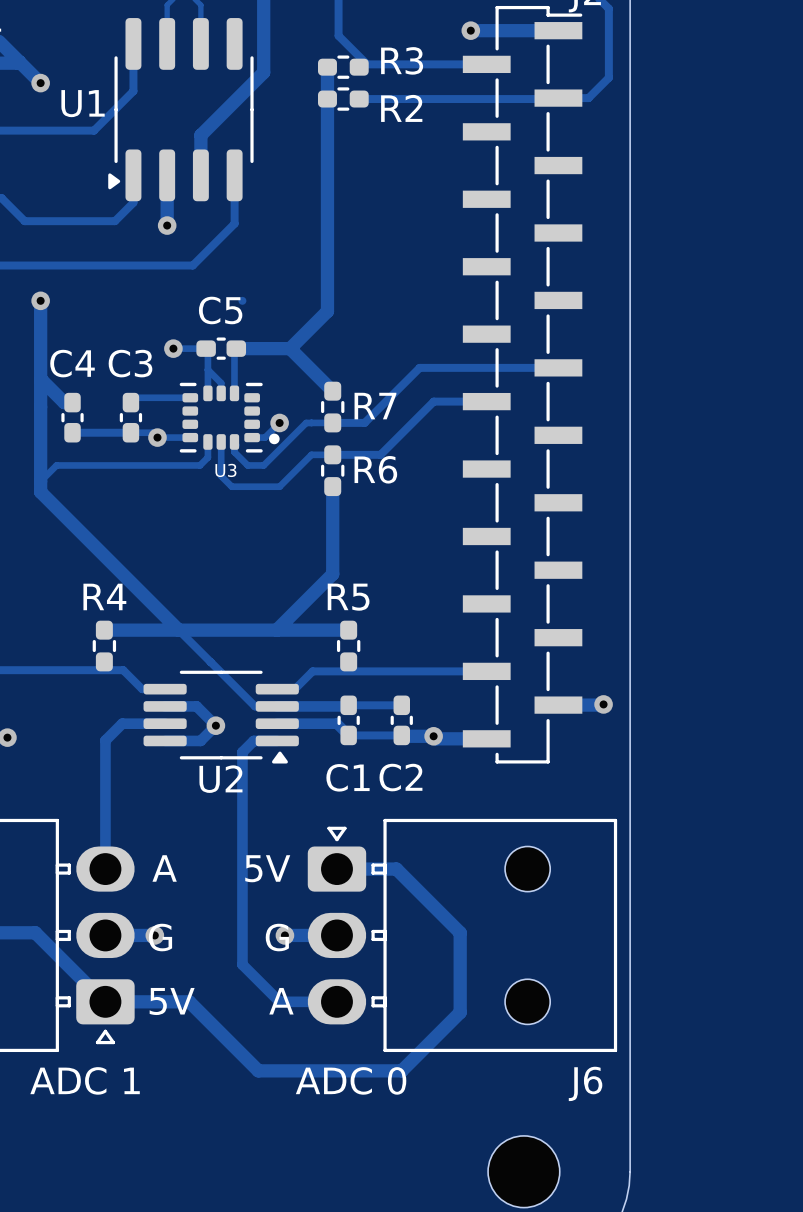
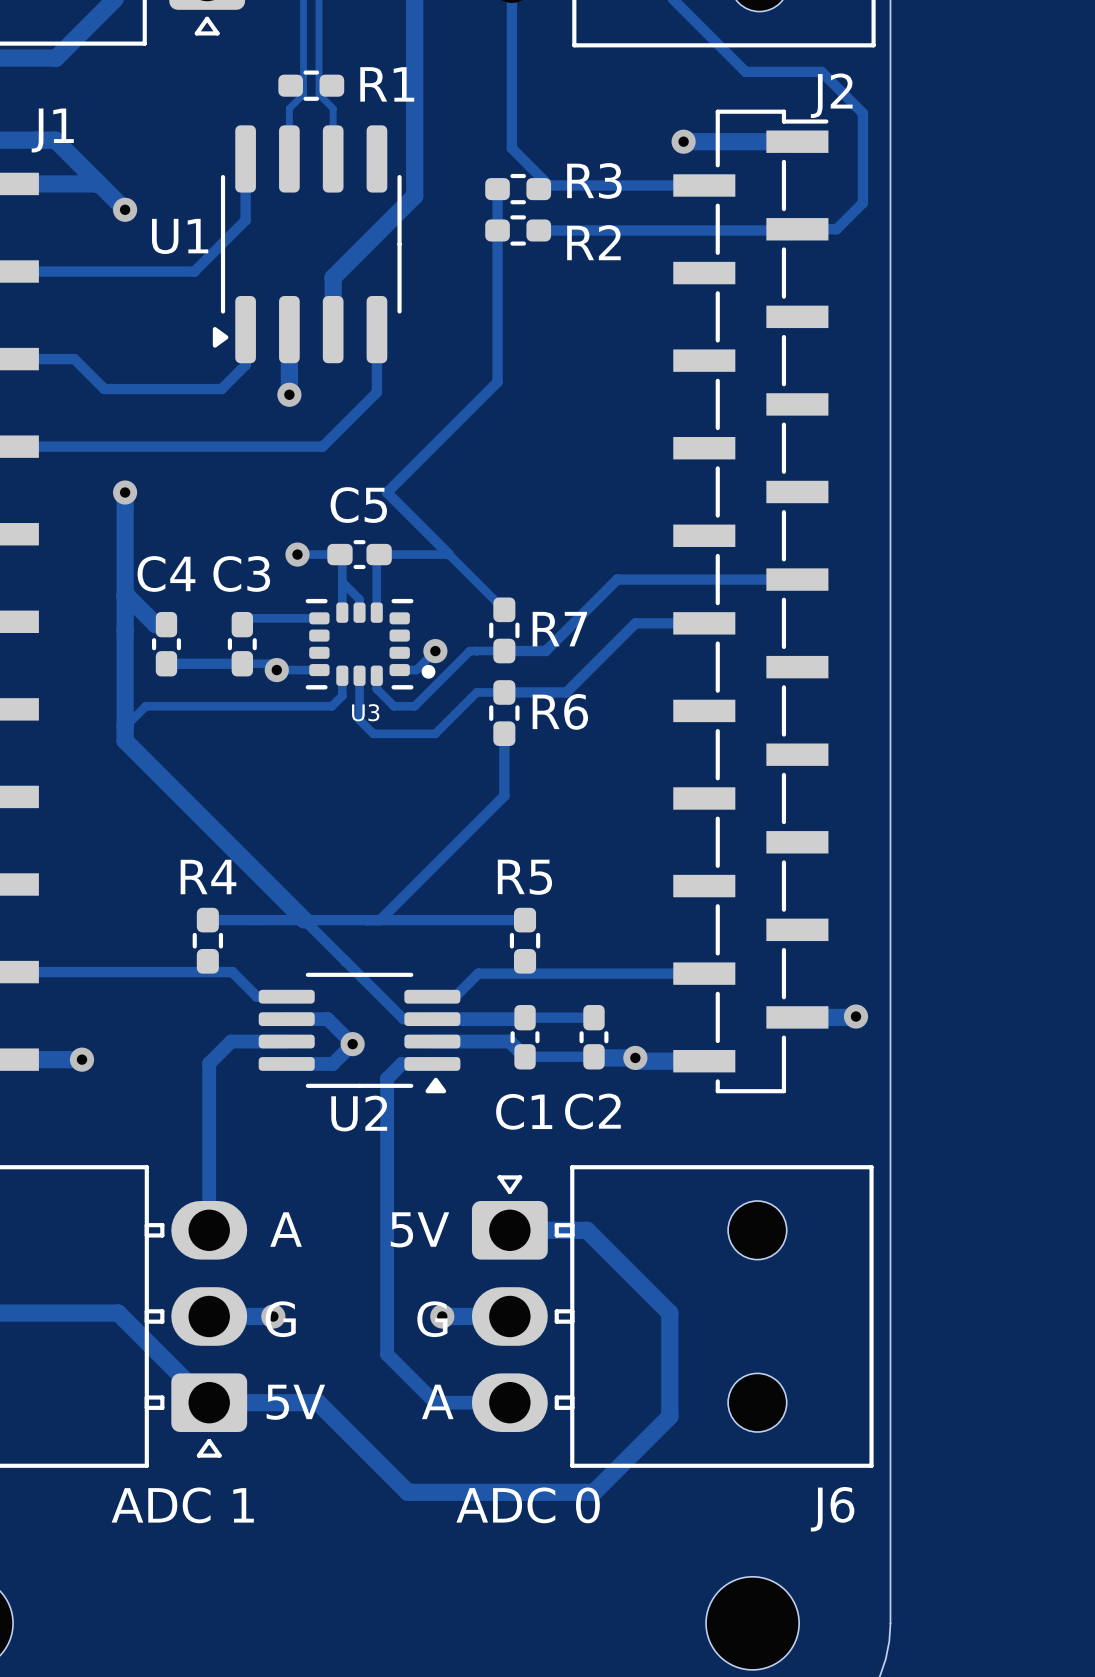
track width: thick (327, 67) (327, 215) -> thin (497, 189) (497, 382)
track: (327, 215) (327, 311) (290, 348) -> (497, 382) (387, 492) (449, 554)
track width: thick (236, 348) (290, 348) (332, 391) -> thin (379, 554) (449, 554) (504, 609)
track width: thick (332, 486) (332, 534) -> thin (504, 733) (504, 795)
track: (332, 534) (332, 574) (276, 630) -> (504, 795) (380, 920)
track width: thick (104, 630) (348, 630) -> thin (207, 920) (525, 920)

